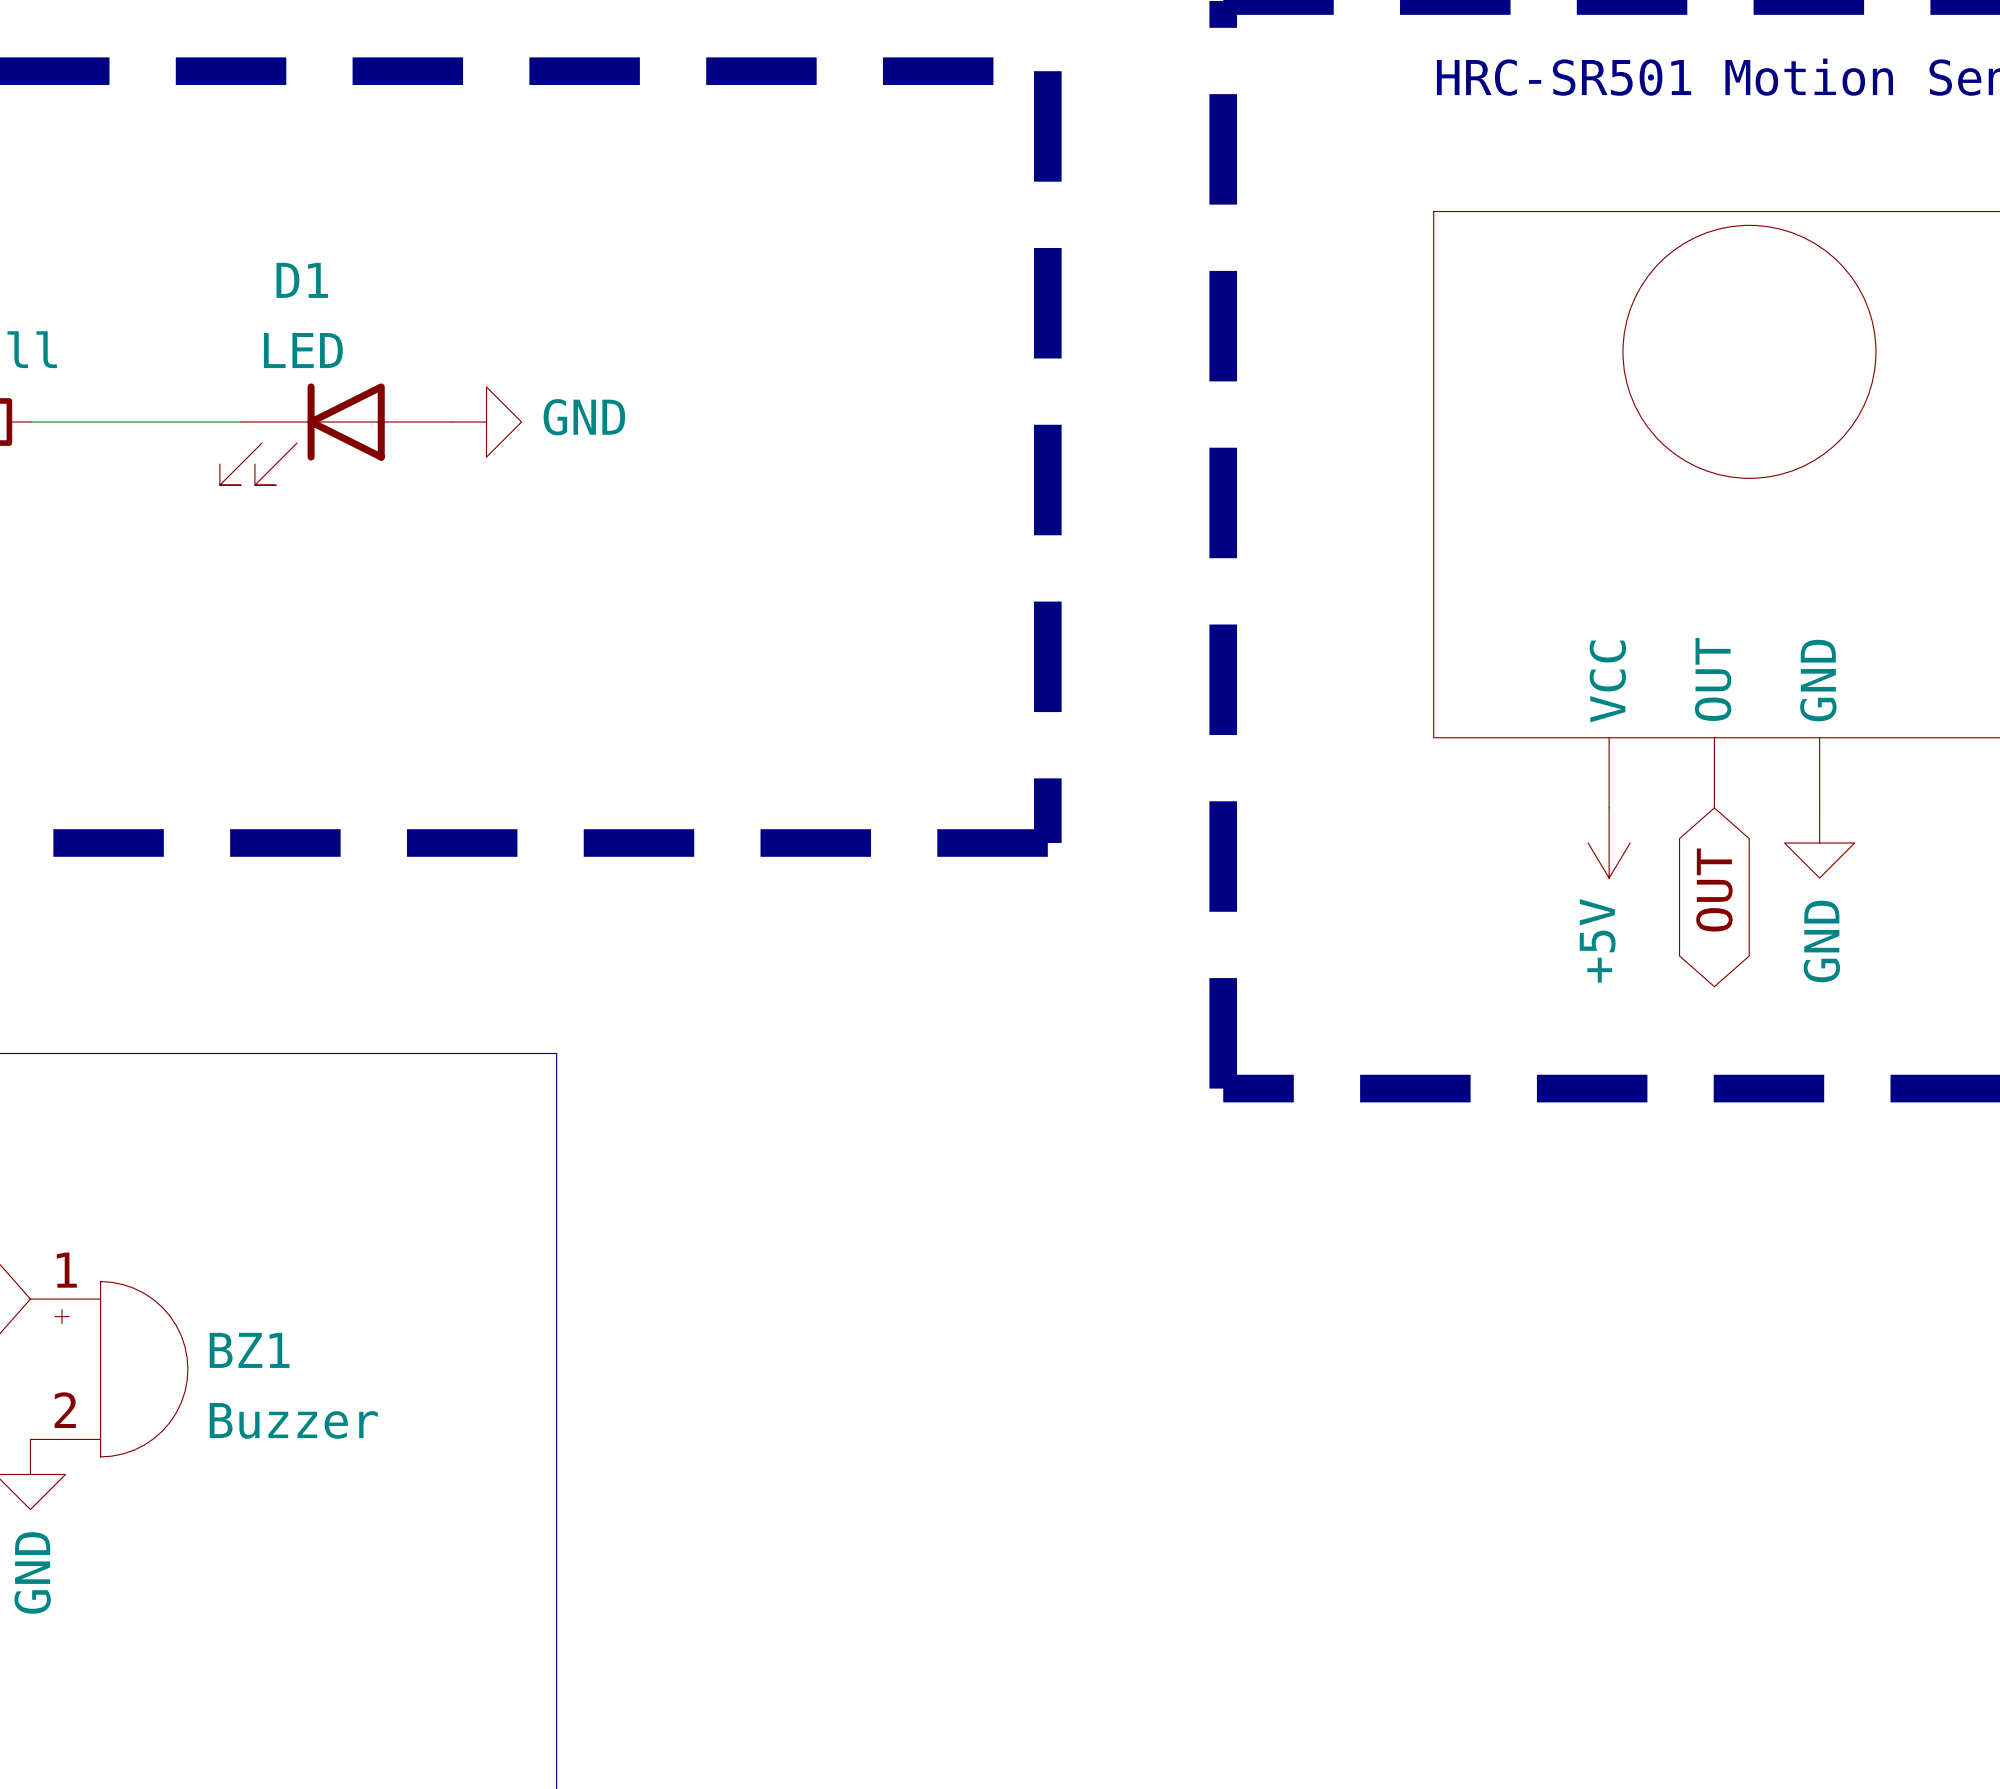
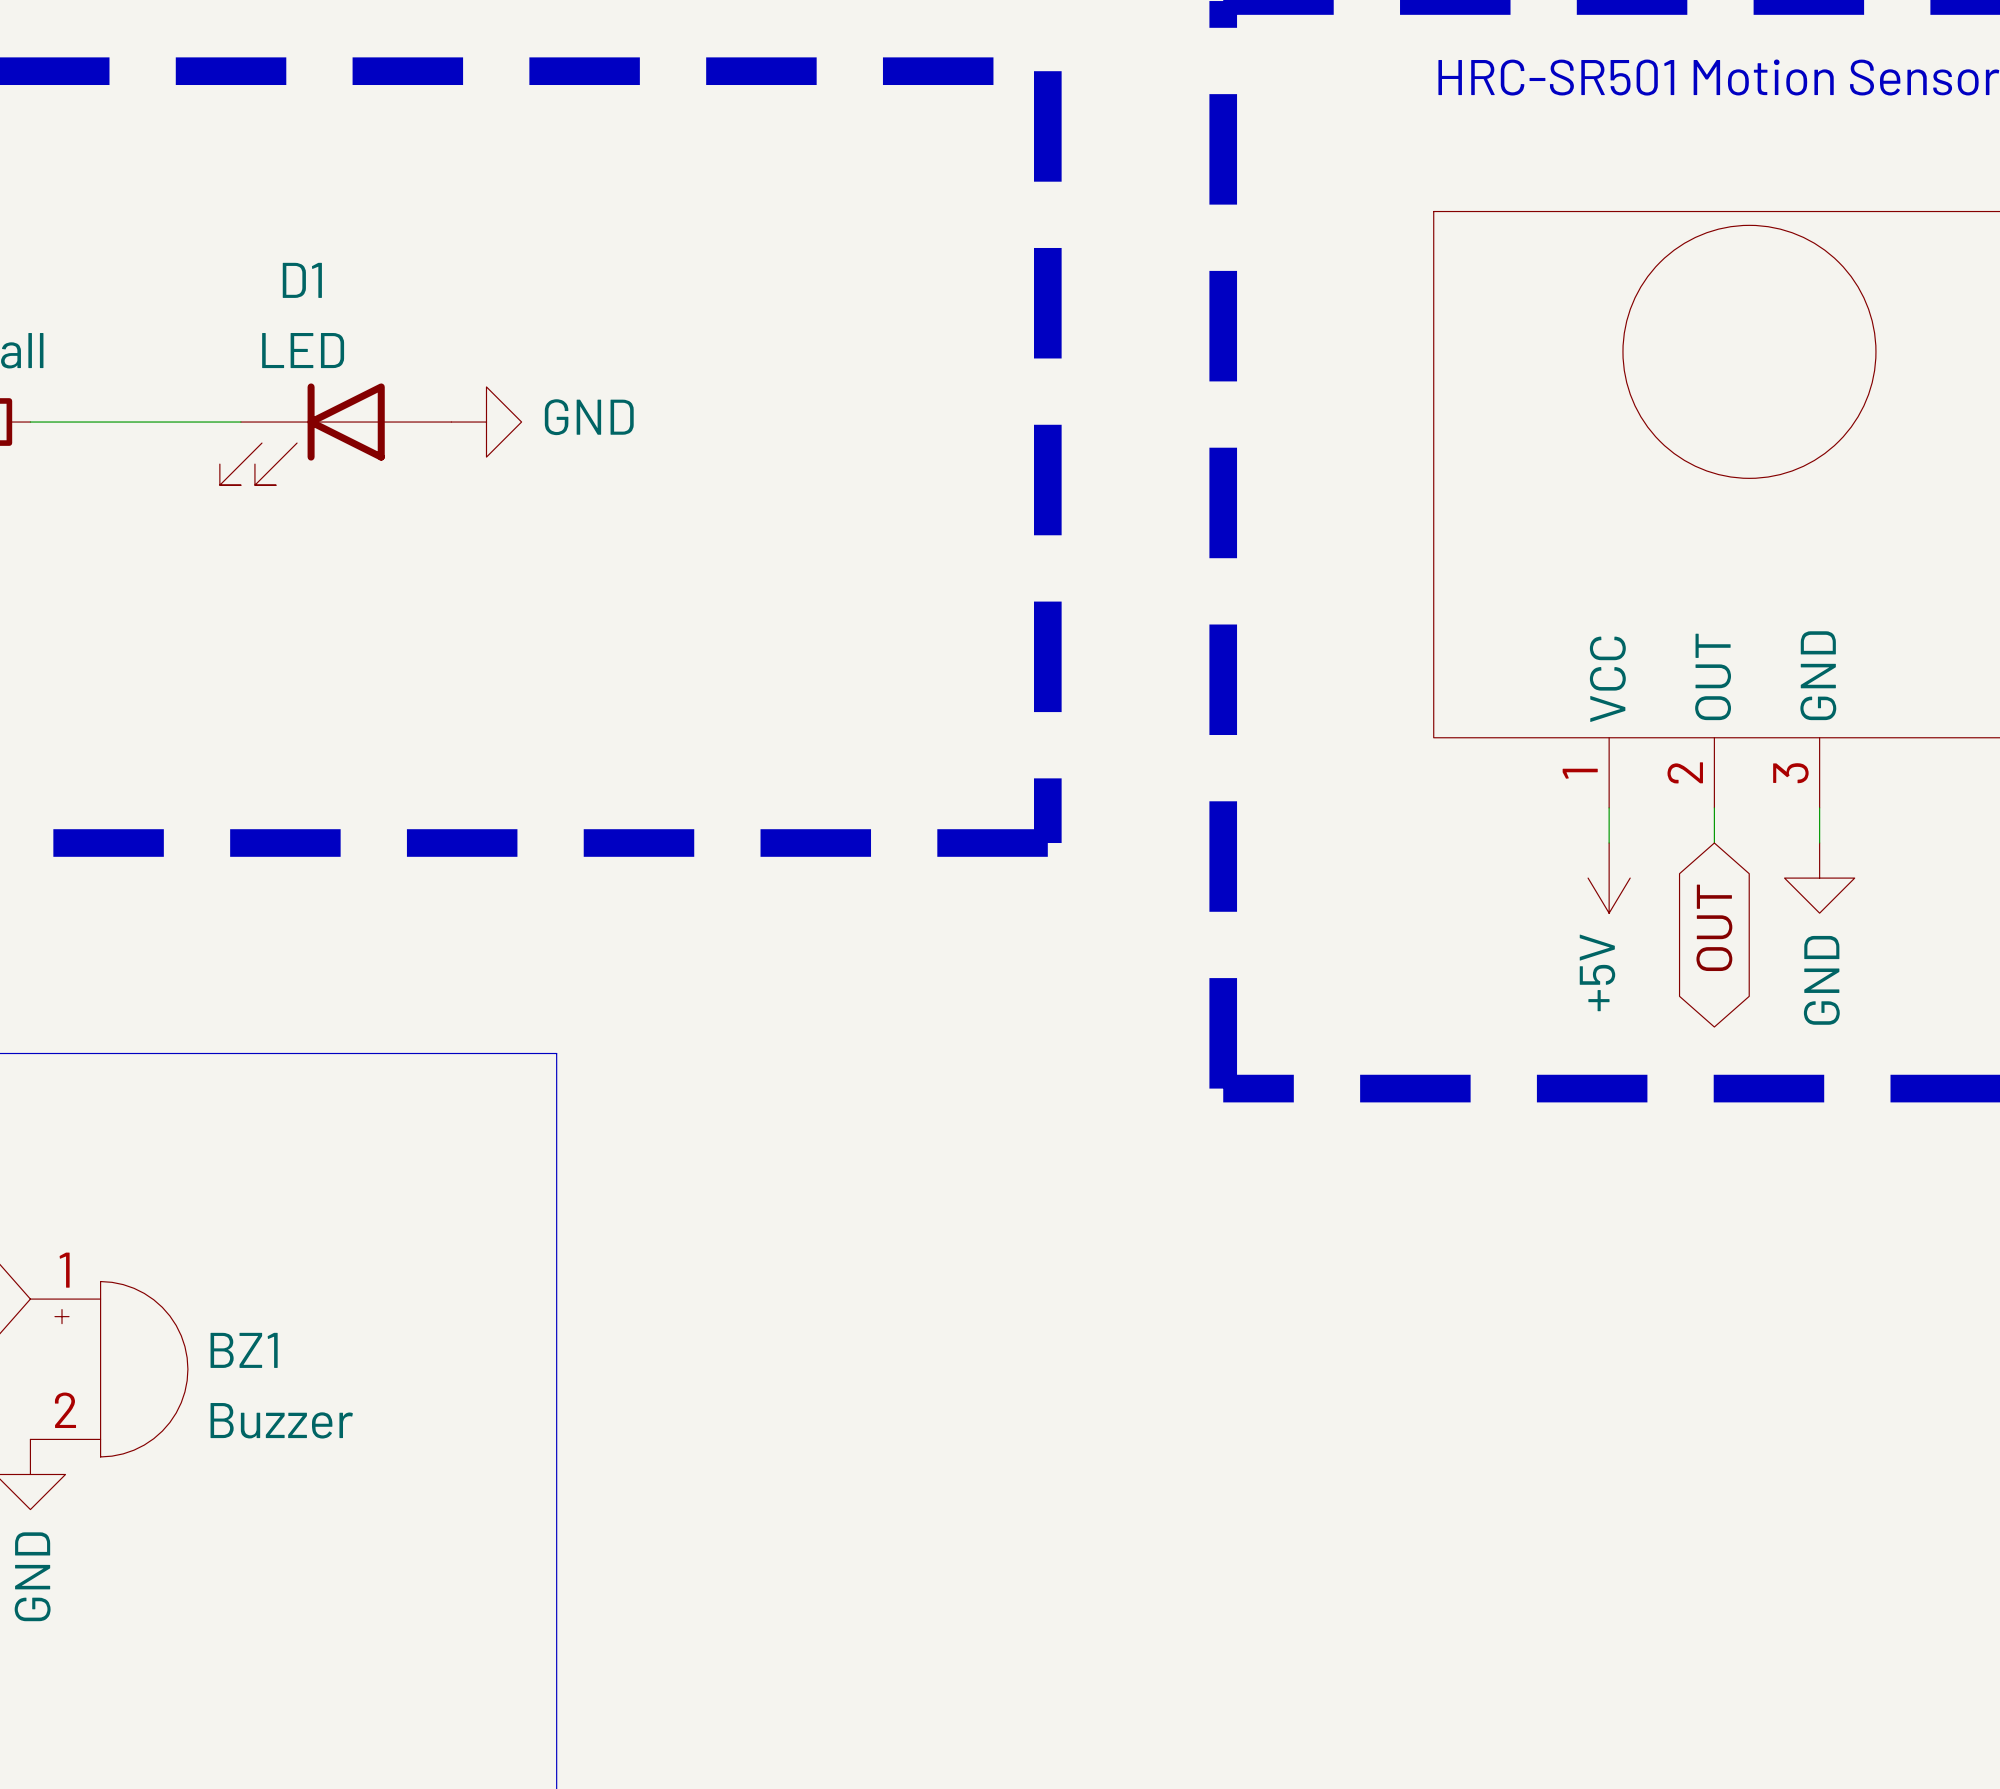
part pin number: none -> 1 (1580, 773)
part pin number: none -> 2 (1685, 772)
part pin number: none -> 3 (1790, 773)
wire: none -> (1714, 807) (1714, 843)
power symbol position: +5V (1609, 843) -> +5V (1609, 878)
power symbol position: GND (1819, 843) -> GND (1819, 878)
global label position: OUT (1714, 890) -> OUT (1714, 927)

